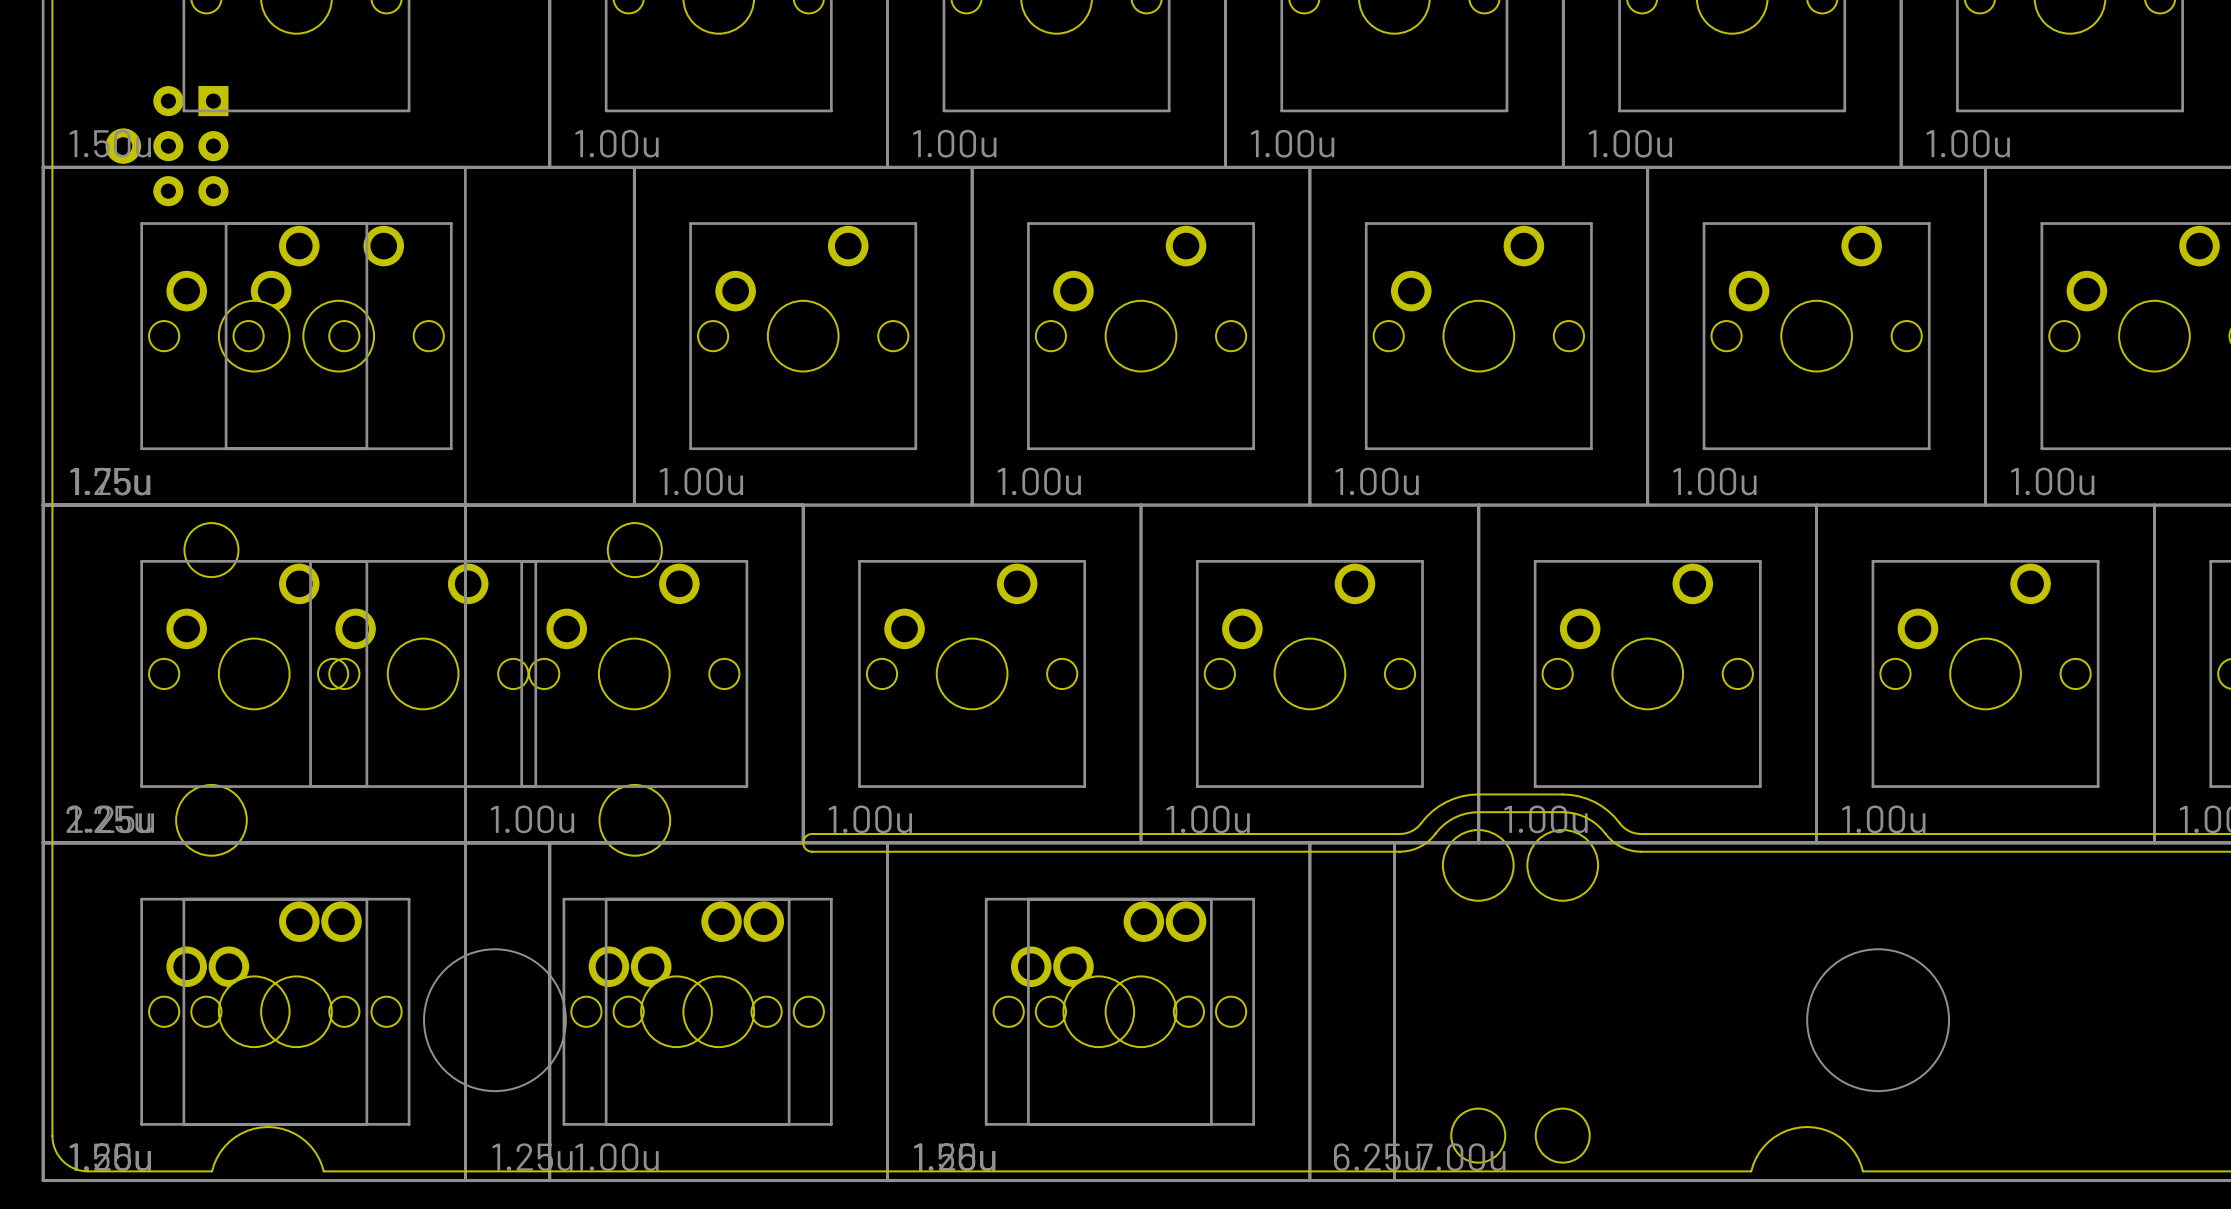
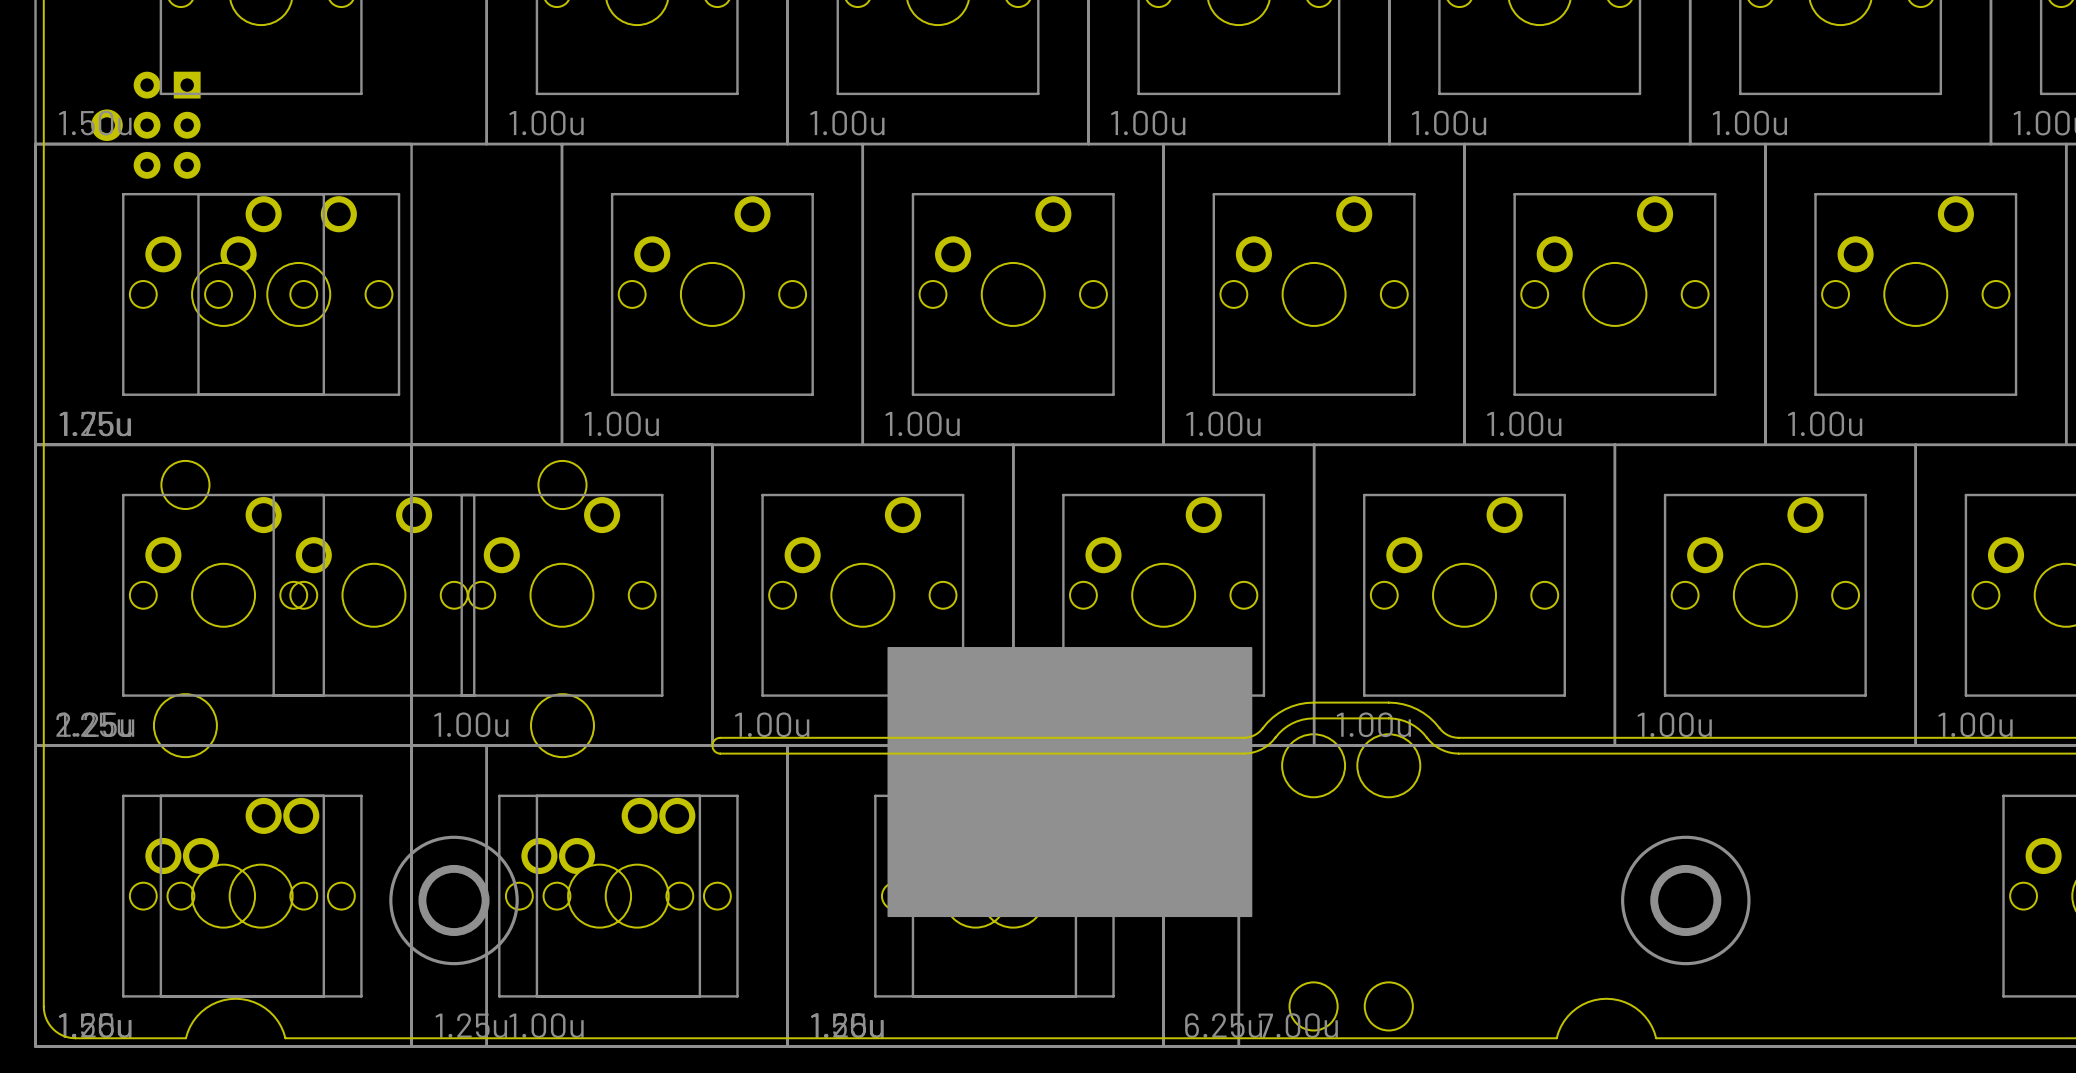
drawing: none -> [887, 647, 1253, 918]
drawing: none -> [389, 835, 519, 966]
drawing: none -> [1621, 835, 1751, 966]
drawing: [423, 948, 567, 1093] -> none
drawing: [1806, 948, 1950, 1093] -> none

